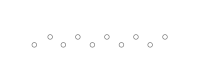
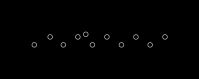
via: none -> (85, 34)

